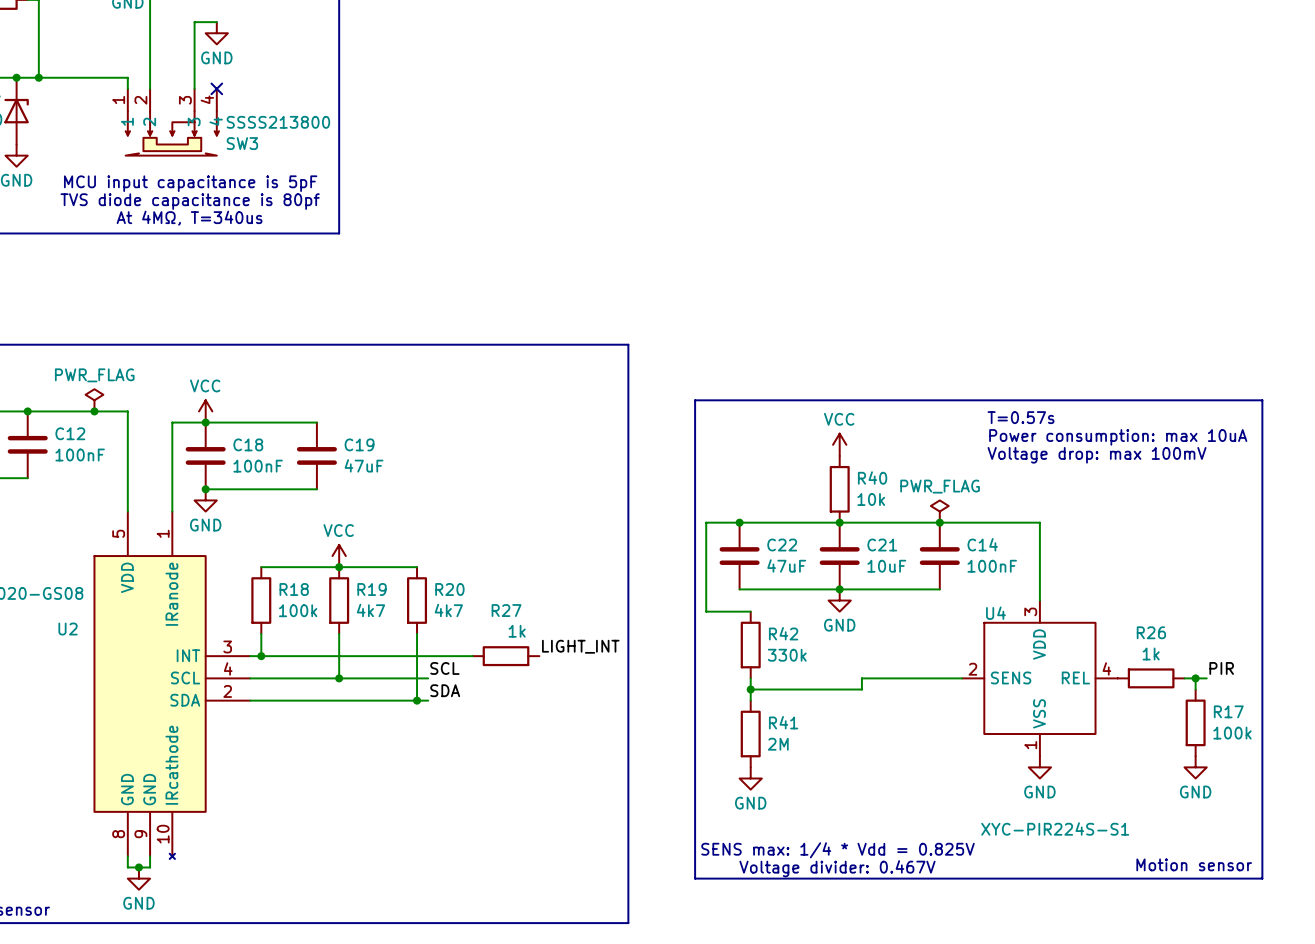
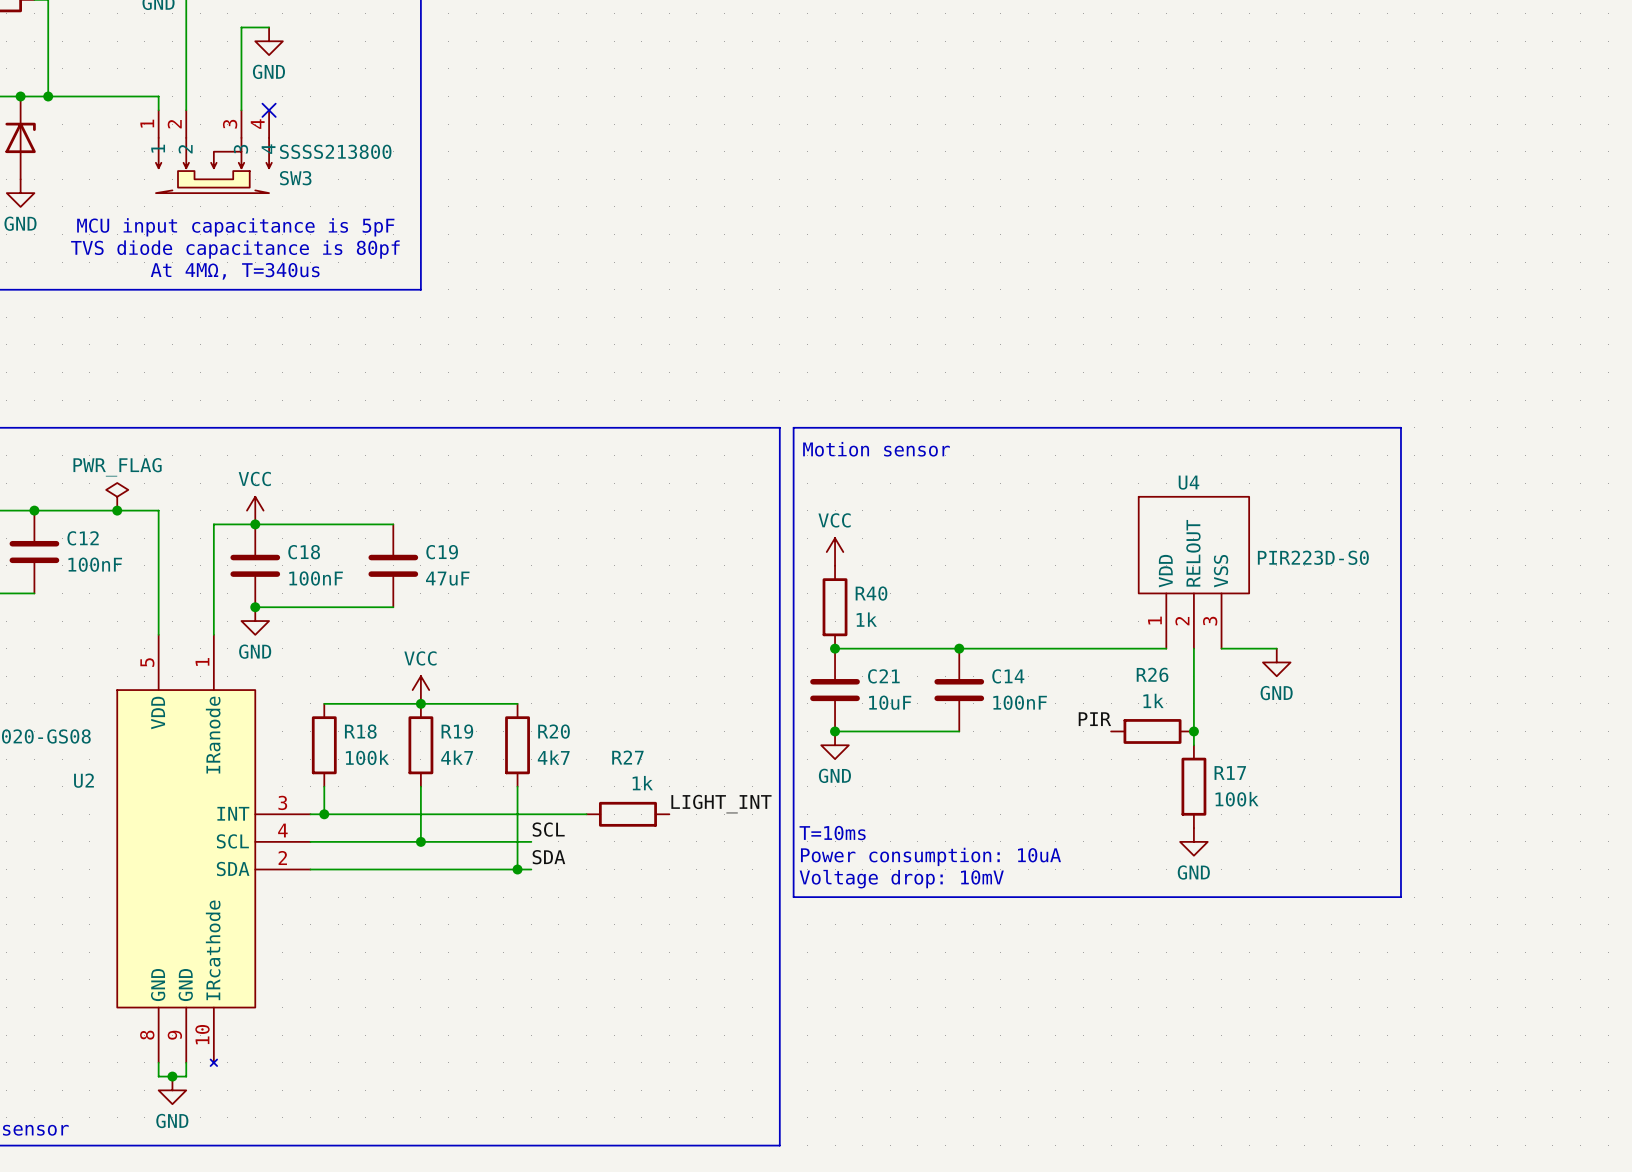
line: none -> (793, 427) (1400, 427) (1400, 897) (793, 897) (793, 427)
text: none -> Motion sensor (876, 449)
line: (695, 400) (695, 878) (1262, 878) (1262, 400) (695, 400) -> none
text: T=0.57s (1021, 417) -> none
text: Power consumption: max 10uA (1118, 437) -> none
power symbol position: VCC (839, 444) -> VCC (835, 552)
text: Voltage drop: max 100mV (1097, 455) -> none
R40 position: (839, 489) -> (835, 607)
R40 value: 10k (871, 499) -> 1k (866, 619)
power symbol: PWR_FLAG (939, 511) -> none
junction: none -> (835, 648)
wire: (706, 522) (706, 611) (750, 611) -> (876, 648) (835, 648)
junction: (739, 522) -> none
junction: none -> (959, 648)
junction: (839, 522) -> none
wire: (939, 522) (984, 522) -> none
junction: (939, 522) -> none
wire: none -> (1193, 648) (1193, 745)
wire: (1028, 522) (1039, 522) (1039, 600) -> none
power symbol: none -> GND (1276, 662)
C22: 47uF (739, 556) -> none
C21 position: (839, 556) -> (835, 690)
C14 position: (939, 556) -> (959, 690)
label: none -> PIR (1094, 719)
wire: none -> (835, 731) (917, 731)
junction: none -> (835, 731)
wire: (772, 589) (939, 589) -> none
junction: (839, 589) -> none
junction: none -> (1193, 731)
power symbol: none -> GND (835, 745)
power symbol: GND (839, 600) -> none
U4 symbol: [962, 600, 1118, 757] -> [1138, 496, 1250, 649]
U4 name position: U4 (995, 613) -> U4 (1188, 482)
R42: 330k (750, 645) -> none
label: PIR (1221, 668) -> none
text: none -> T=10ms (832, 833)
wire: (750, 678) (750, 700) -> none
wire: (962, 678) (861, 678) (861, 689) (750, 689) -> none
power symbol: none -> GND (1193, 841)
R26 position: (1151, 678) -> (1152, 731)
wire: (1184, 678) (1206, 678) -> none
wire: (1195, 678) (1195, 689) -> none
junction: (1195, 678) -> none
junction: (750, 689) -> none
text: none -> Power consumption: 10uA (930, 856)
text: none -> Voltage drop: 10mV (901, 879)
R17 position: (1195, 722) -> (1193, 786)
R41: 2M (750, 734) -> none
power symbol: GND (1039, 767) -> none
power symbol: GND (1195, 767) -> none
power symbol: GND (750, 778) -> none
U4 value: XYC-PIR224S-S1 (1055, 828) -> PIR223D-S0 (1313, 557)
text: SENS max: 1/4 * Vdd = 0.825V (838, 850) -> none
text: Motion sensor (1194, 864) -> none
text: Voltage divider: 0.467V (837, 868) -> none

